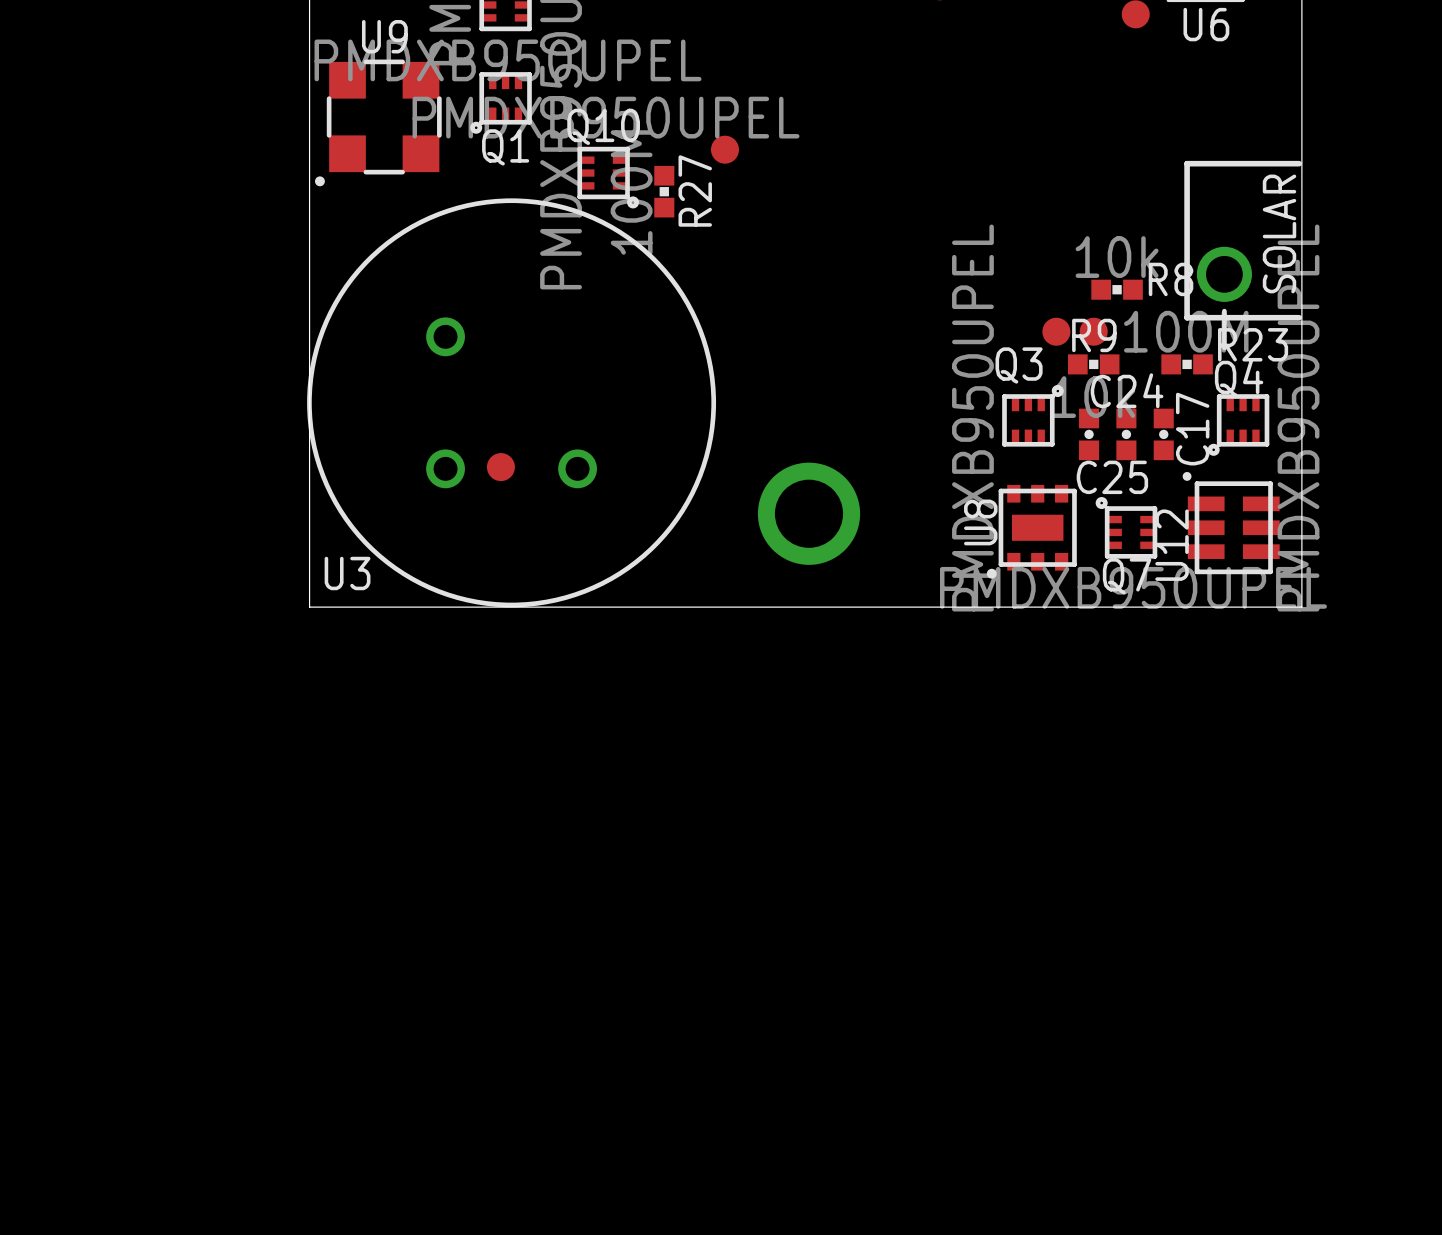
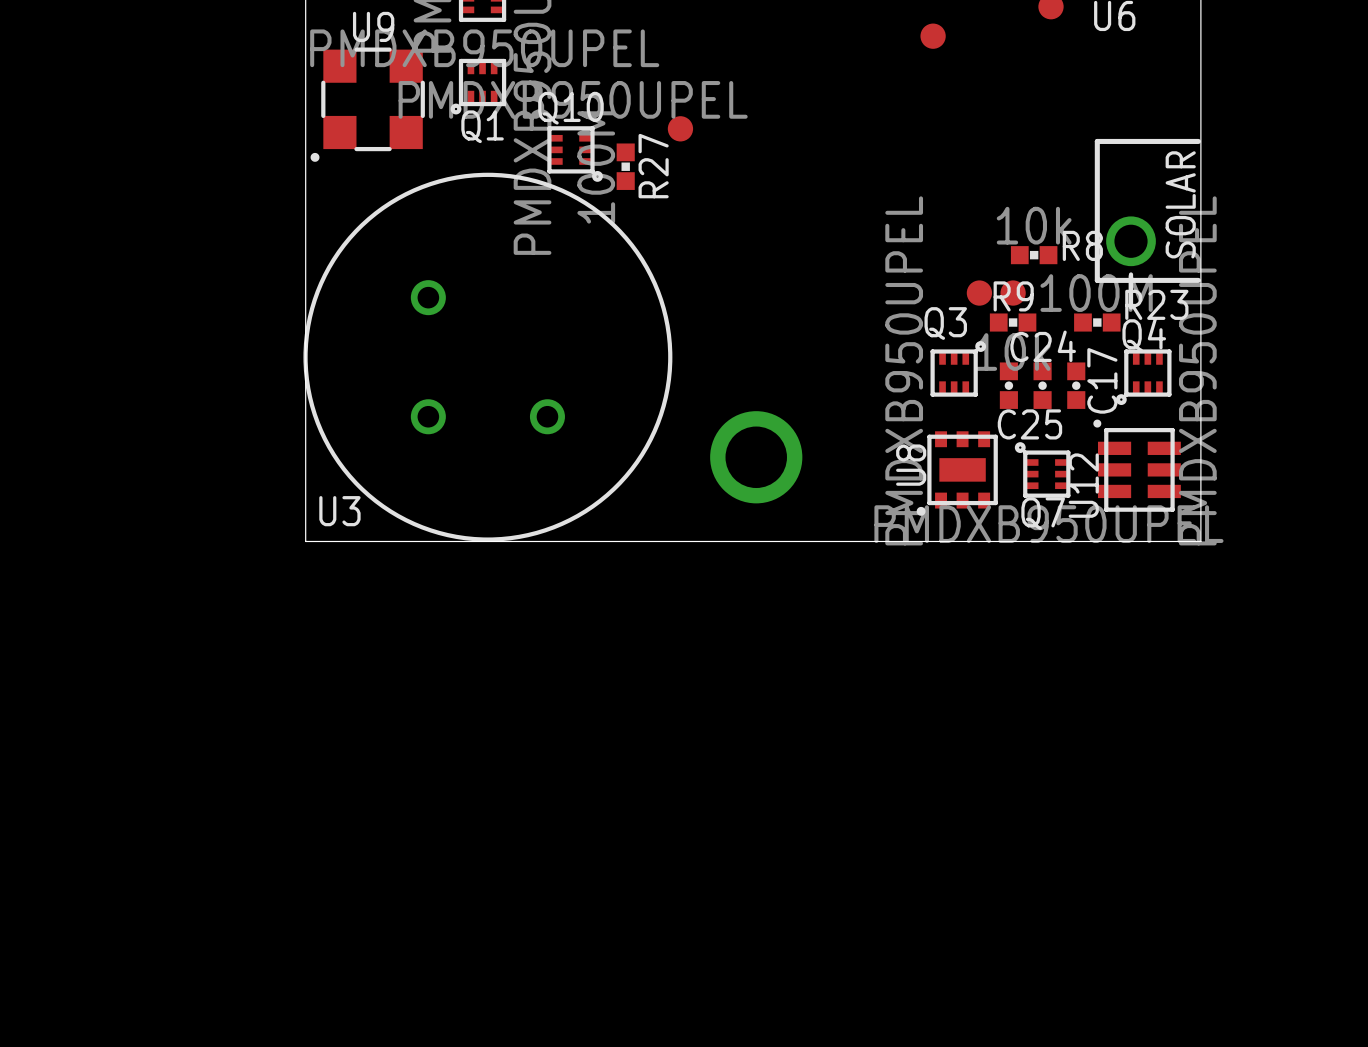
part position: (500, 467) -> (933, 36)

